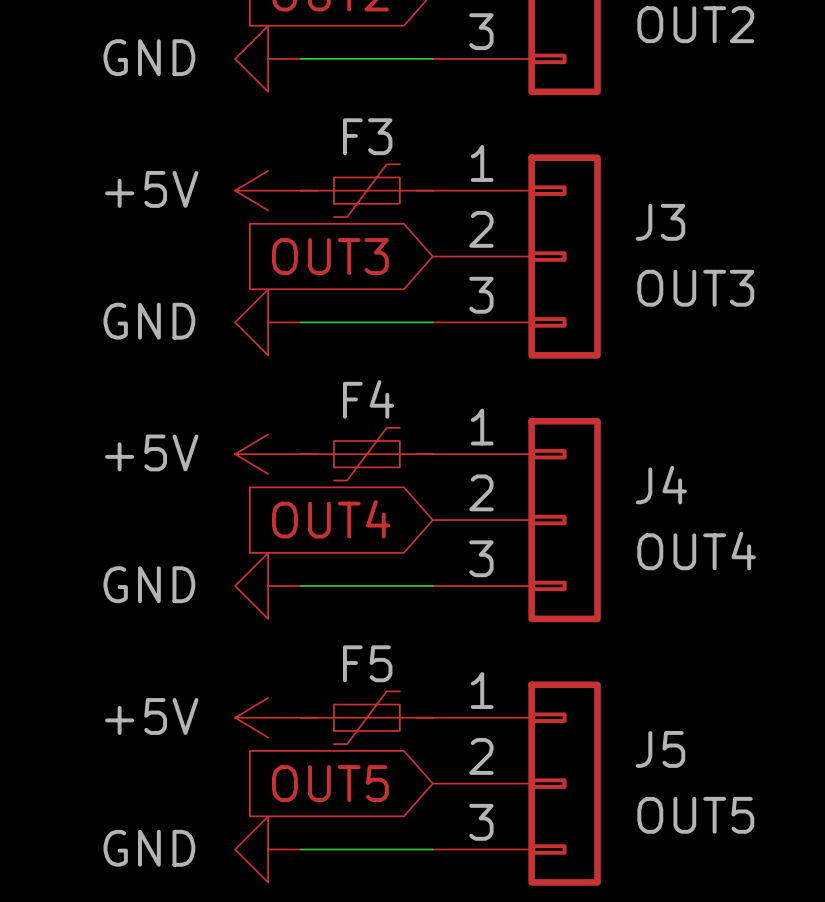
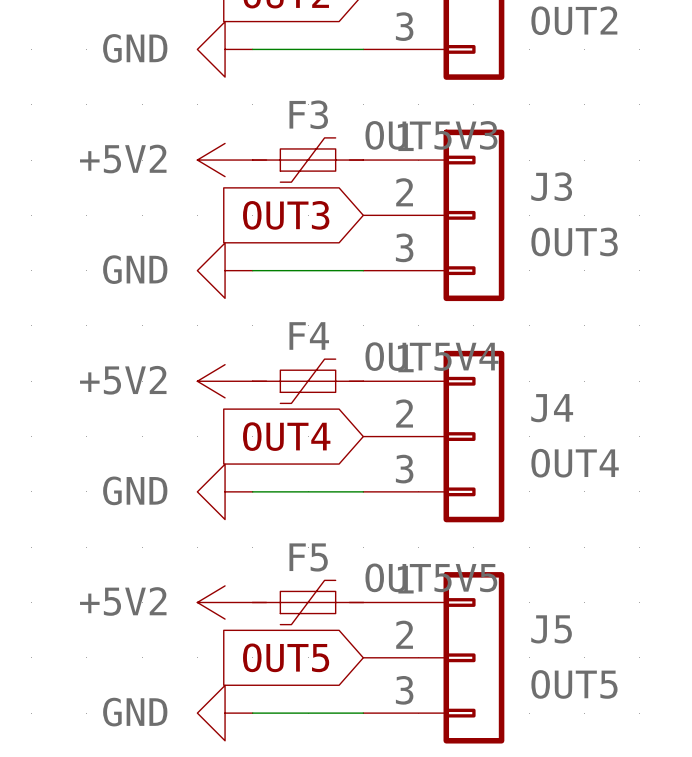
label: none -> OUT5V3 (431, 135)
power symbol: +5V (268, 190) -> +5V2 (225, 160)
label: none -> OUT5V4 (431, 356)
power symbol: +5V (268, 454) -> +5V2 (225, 381)
label: none -> OUT5V5 (431, 577)
power symbol: +5V (268, 717) -> +5V2 (225, 602)

